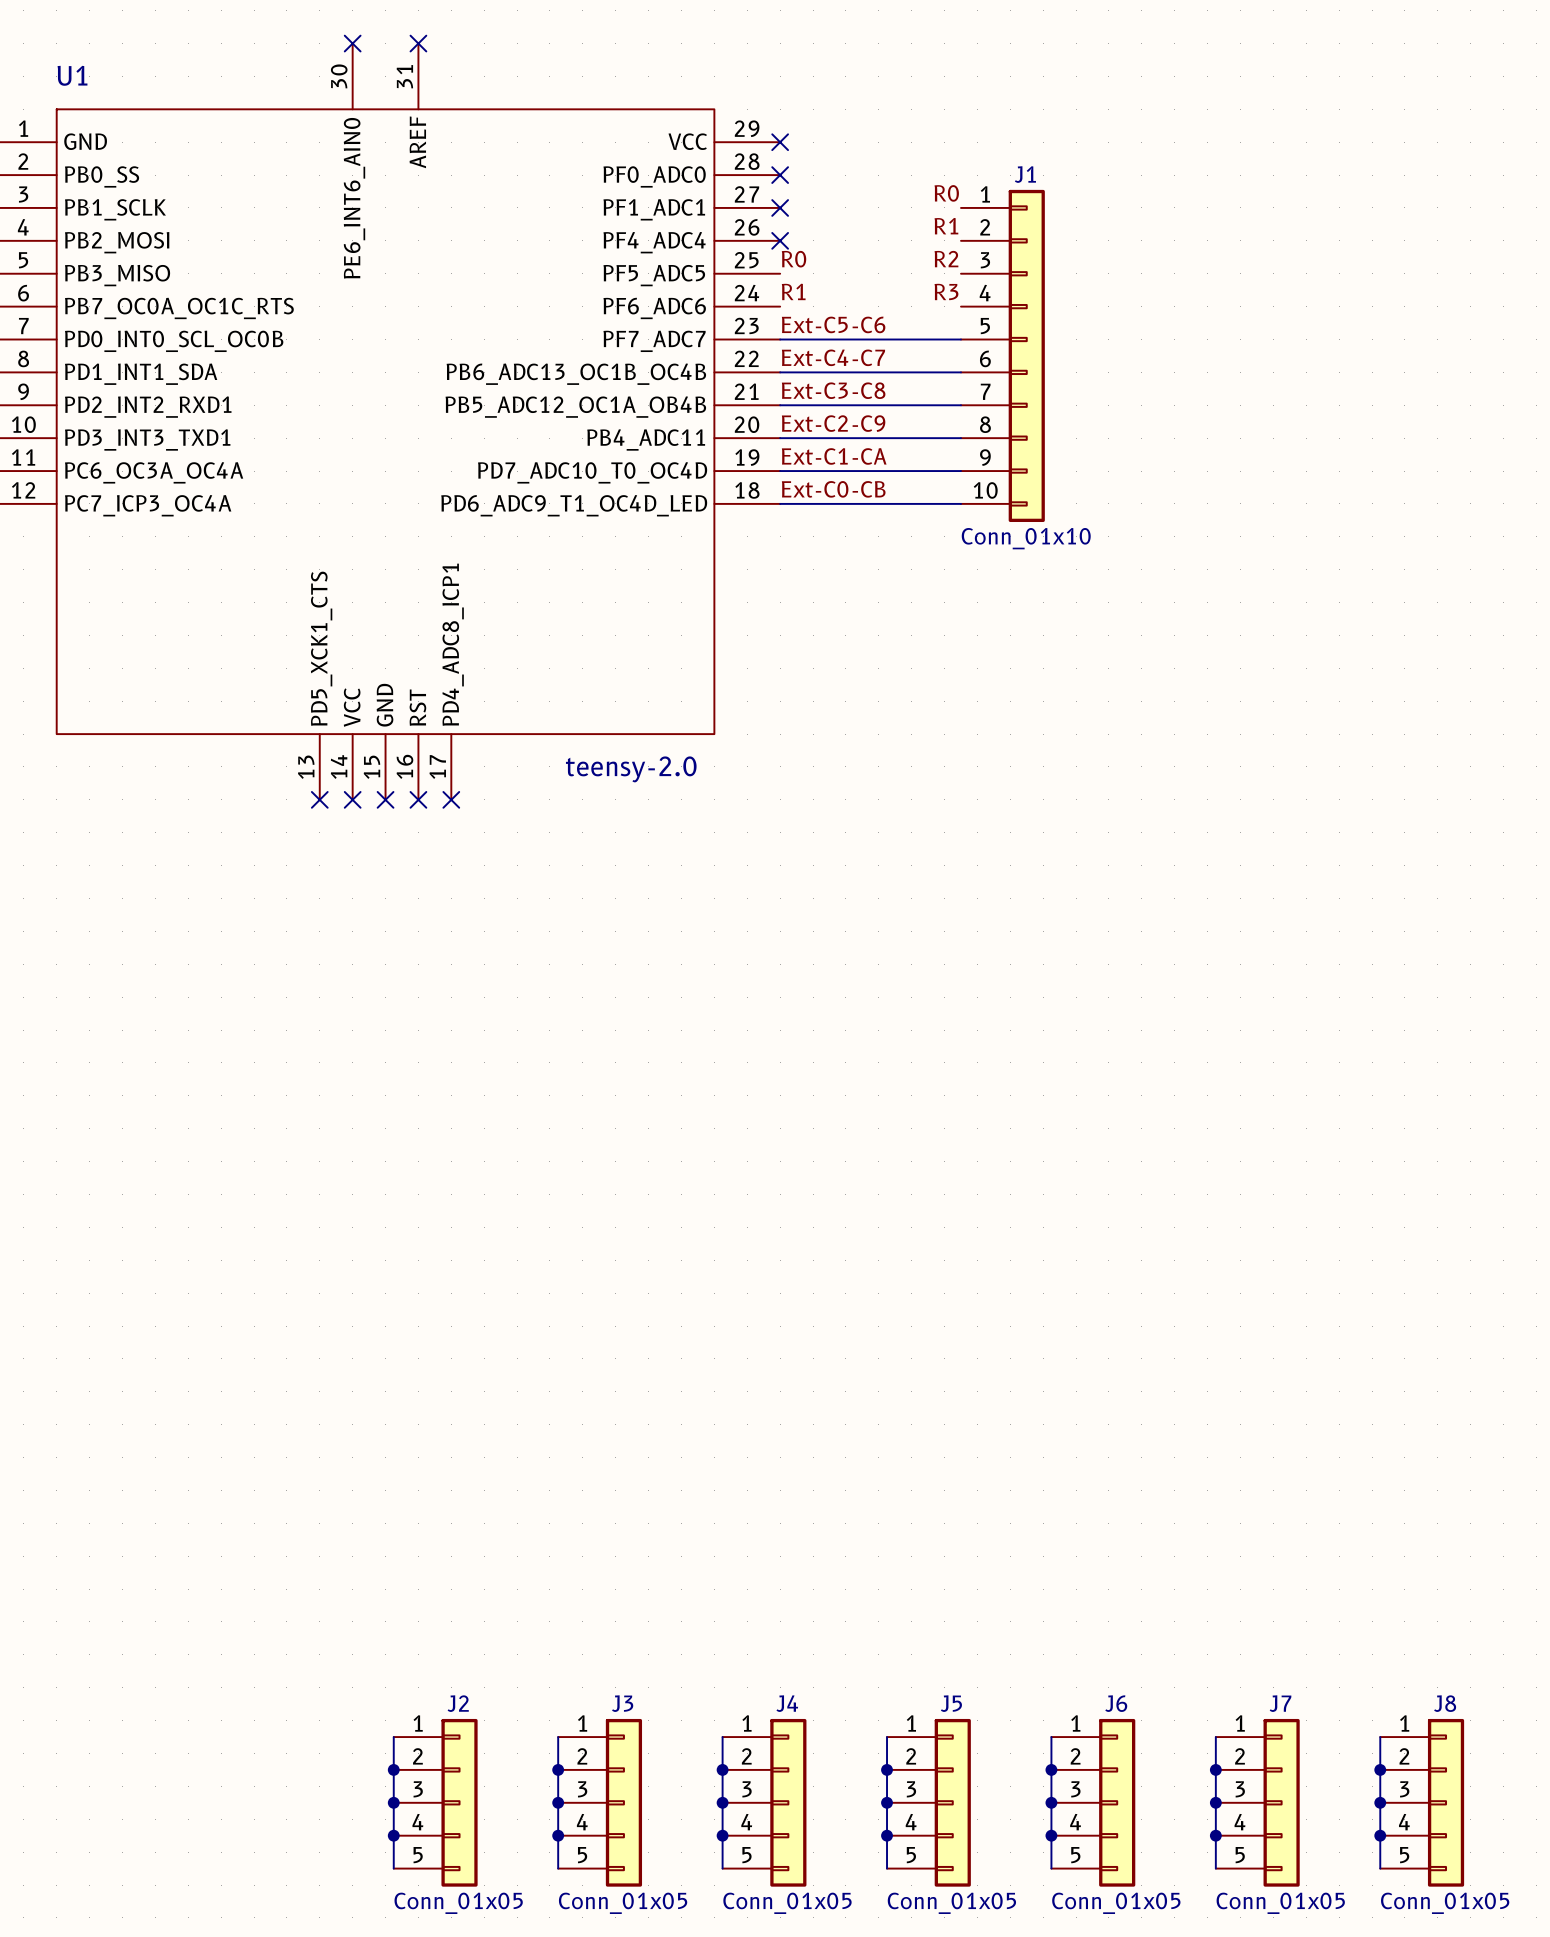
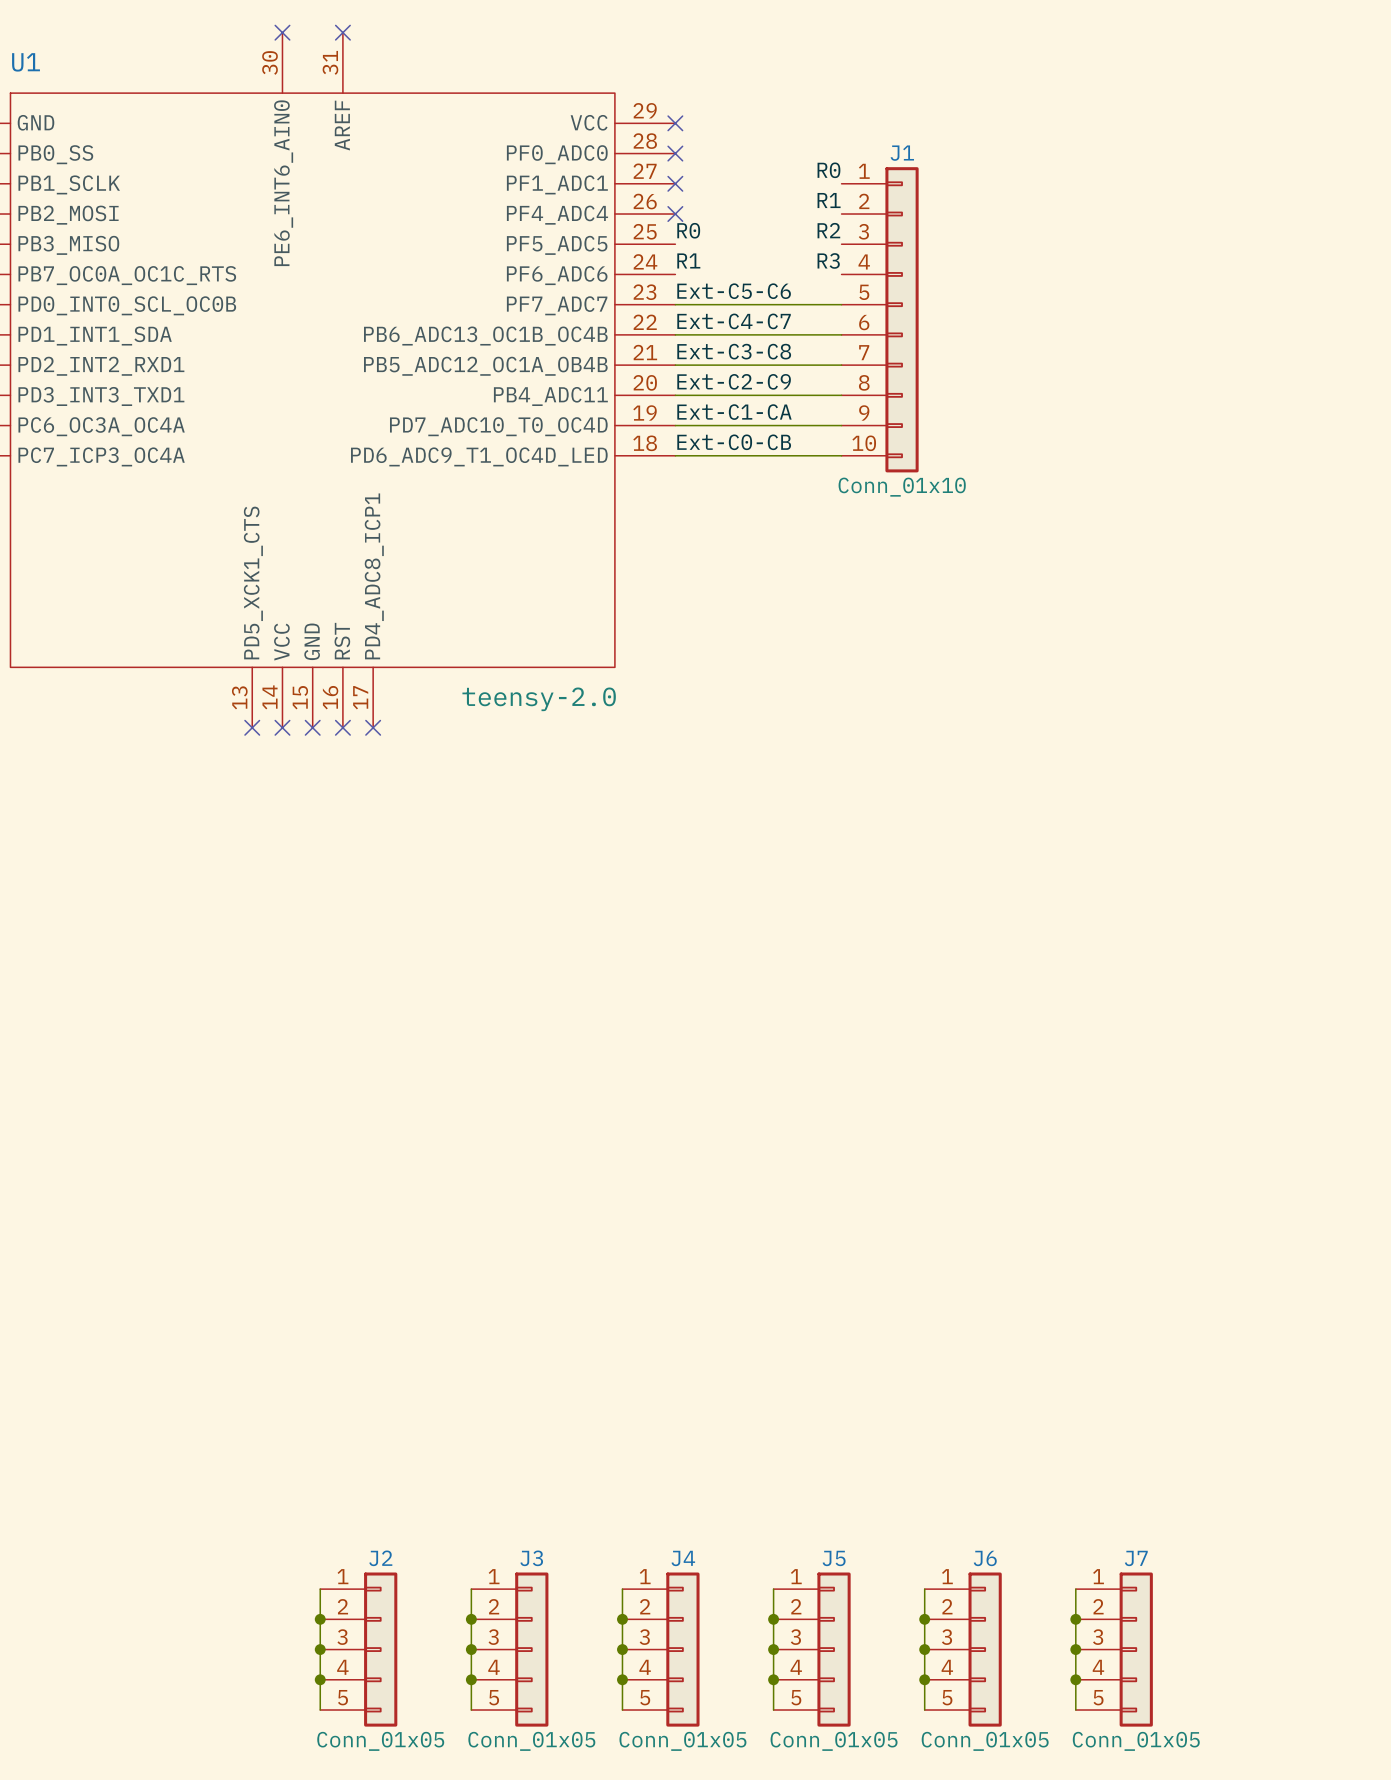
wire: (1380, 1737) (1380, 1868) -> none
junction: (1380, 1769) -> none
junction: (1380, 1802) -> none
J8: Conn_01x05 (1422, 1802) -> none
junction: (1380, 1835) -> none

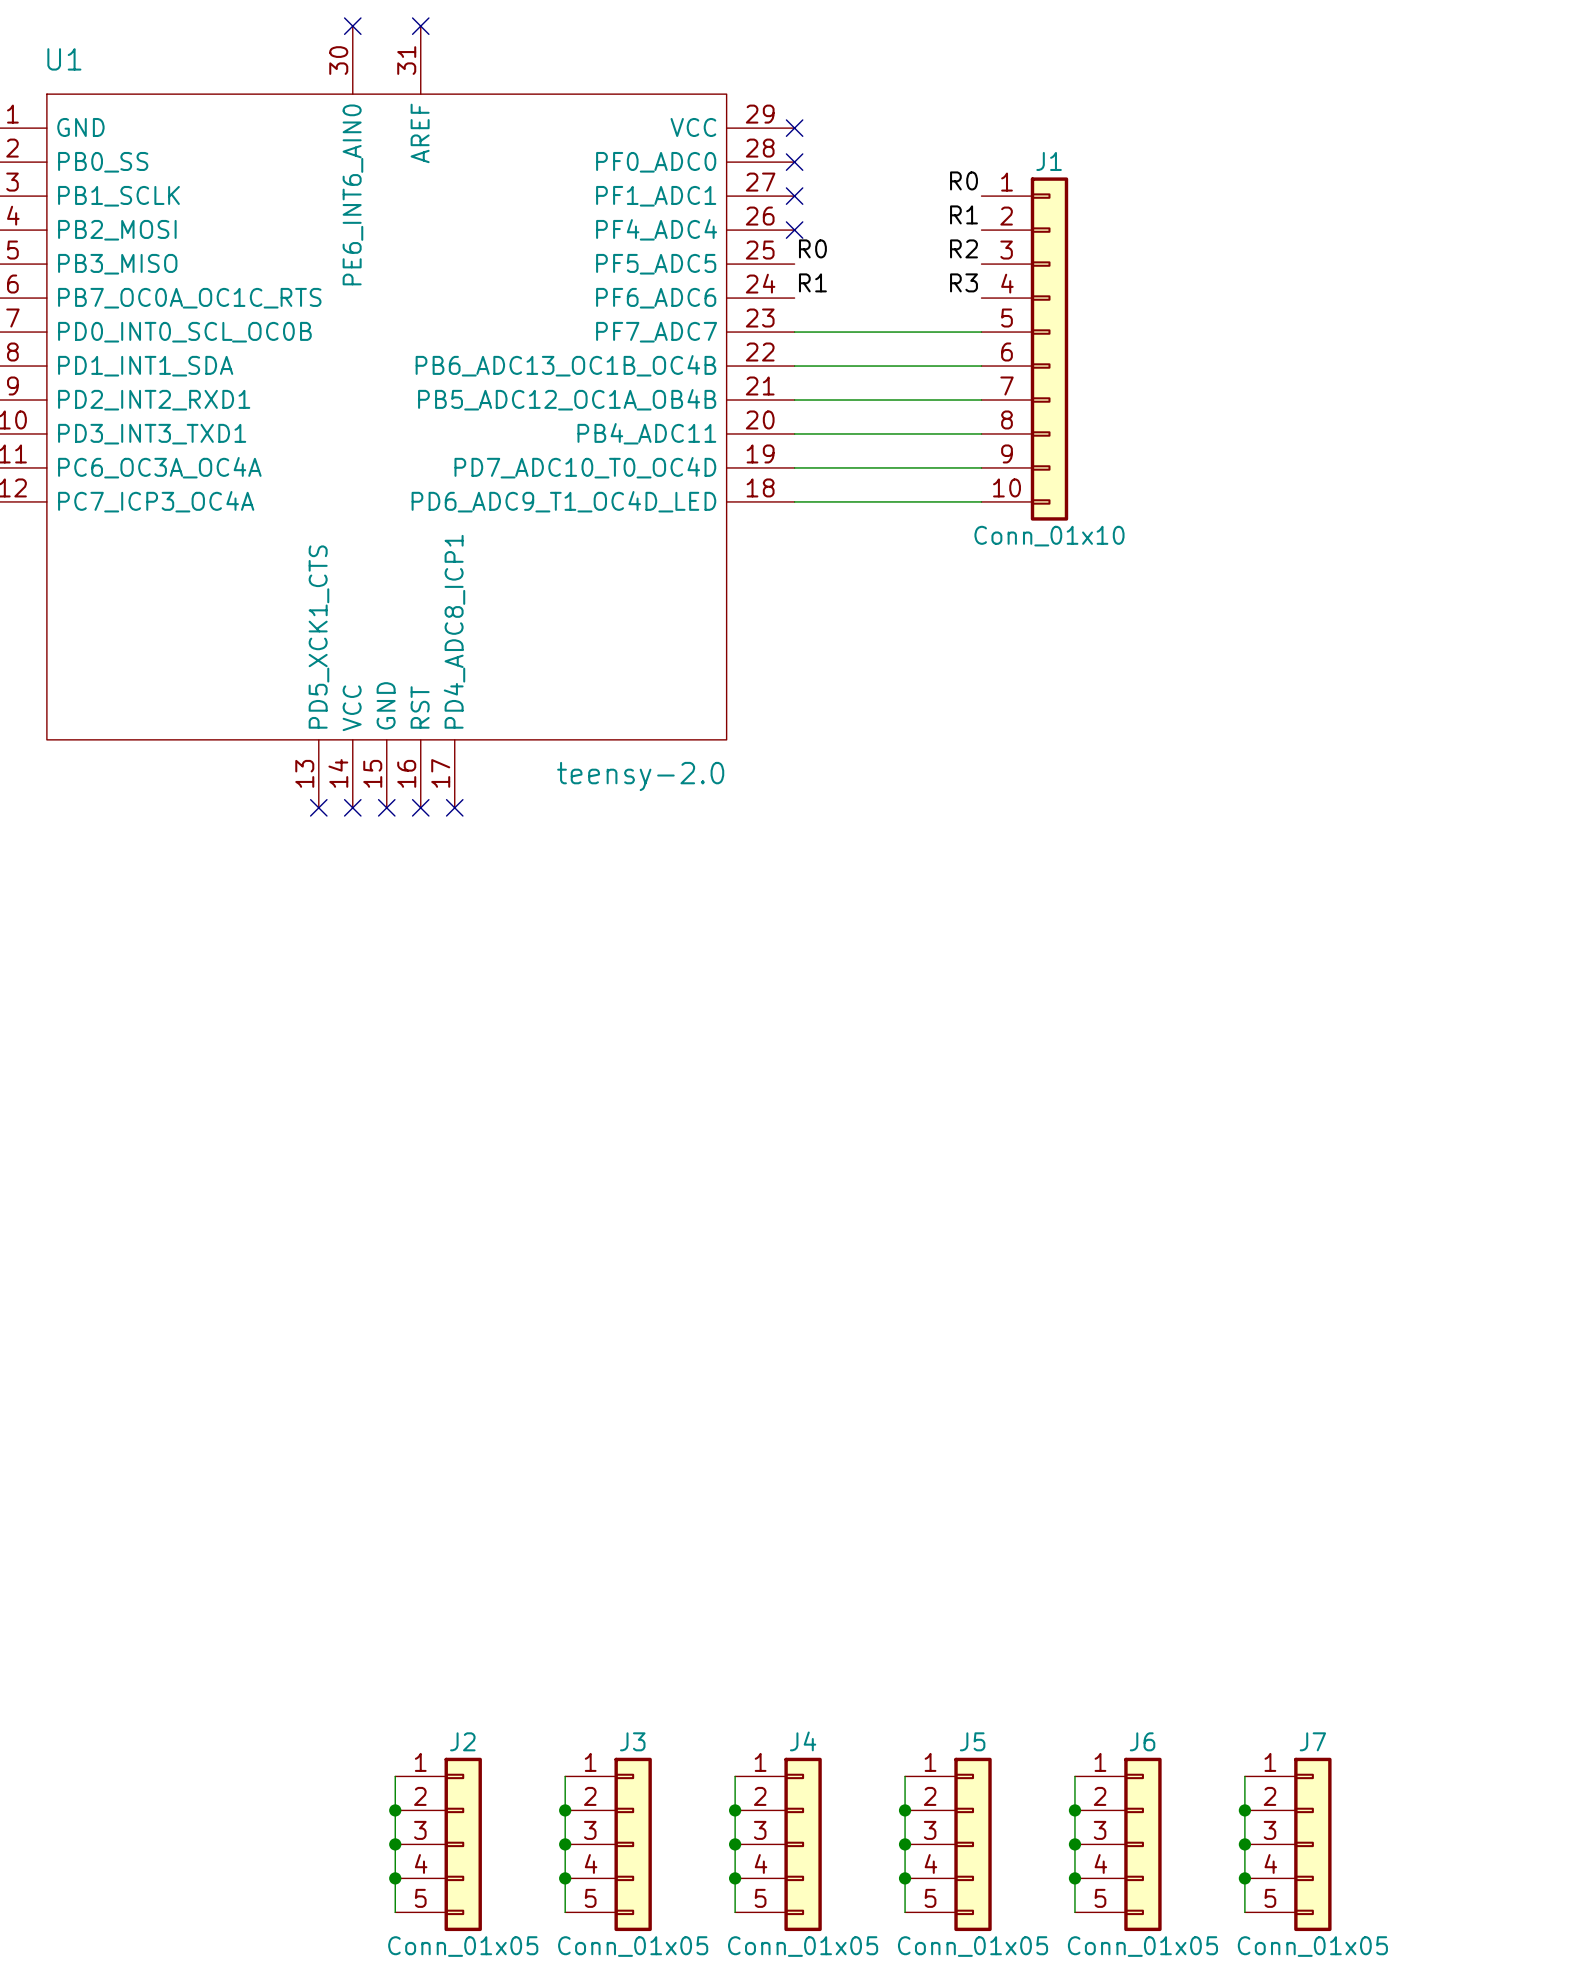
label: Ext-C5-C6 (734, 291) -> none
label: Ext-C4-C7 (734, 321) -> none
label: Ext-C3-C8 (734, 351) -> none
label: Ext-C2-C9 (734, 381) -> none
label: Ext-C1-CA (734, 412) -> none
label: Ext-C0-CB (734, 442) -> none

